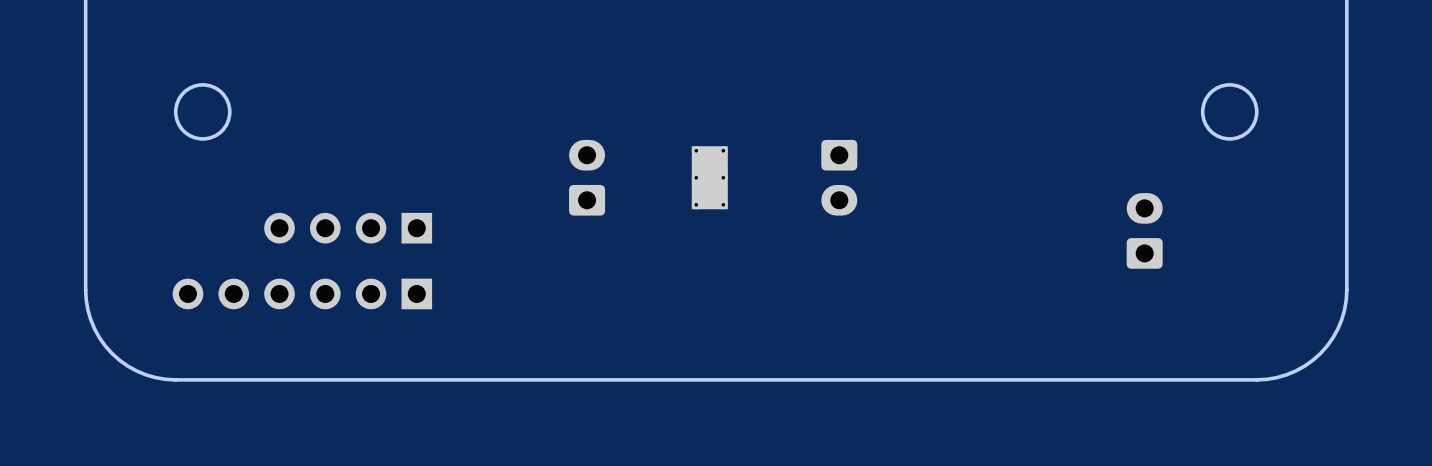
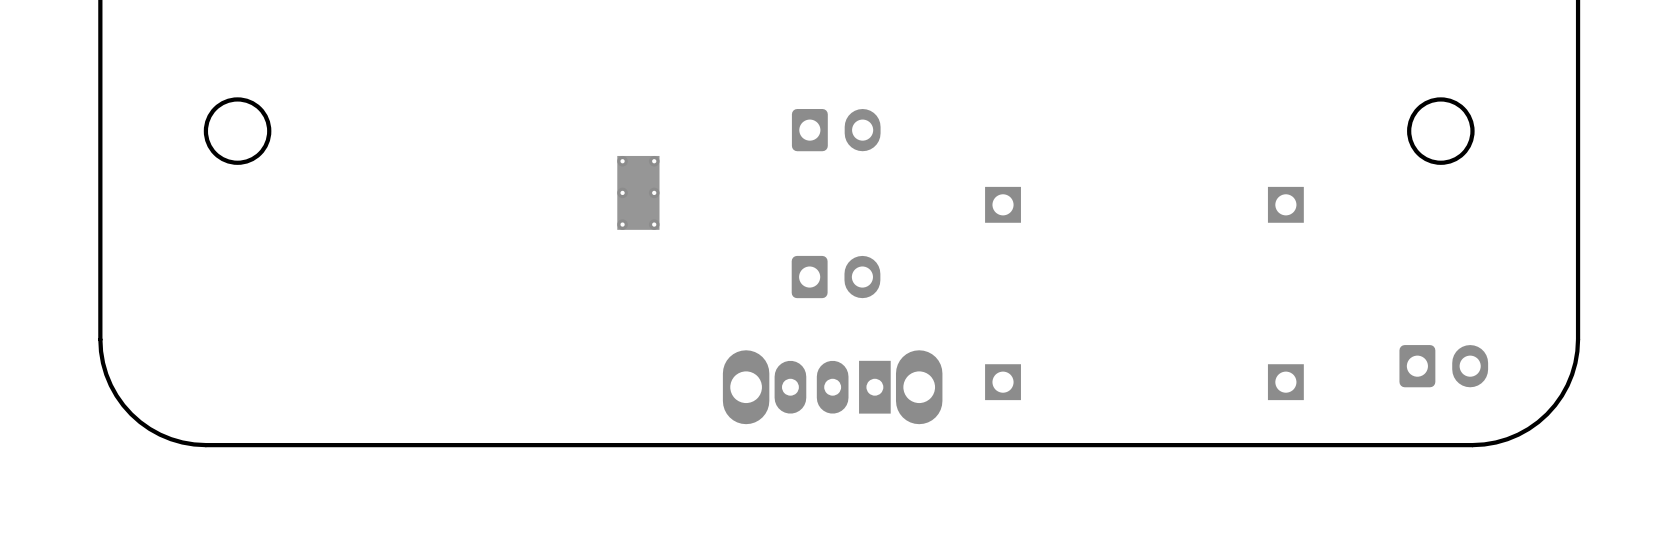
part: none -> (836, 130)
part footprint: [821, 139, 858, 216] -> [985, 186, 1021, 223]
part: none -> (1285, 204)
part: (587, 177) -> none
part position: (709, 177) -> (638, 192)
part: (348, 228) -> none
part rotation: 0° (1144, 230) -> 90° clockwise (1443, 366)
part position: (1144, 230) -> (1443, 366)
part: none -> (836, 277)
part: (302, 293) -> none
part: none -> (1003, 382)
part: none -> (1285, 382)
part: none -> (832, 387)

